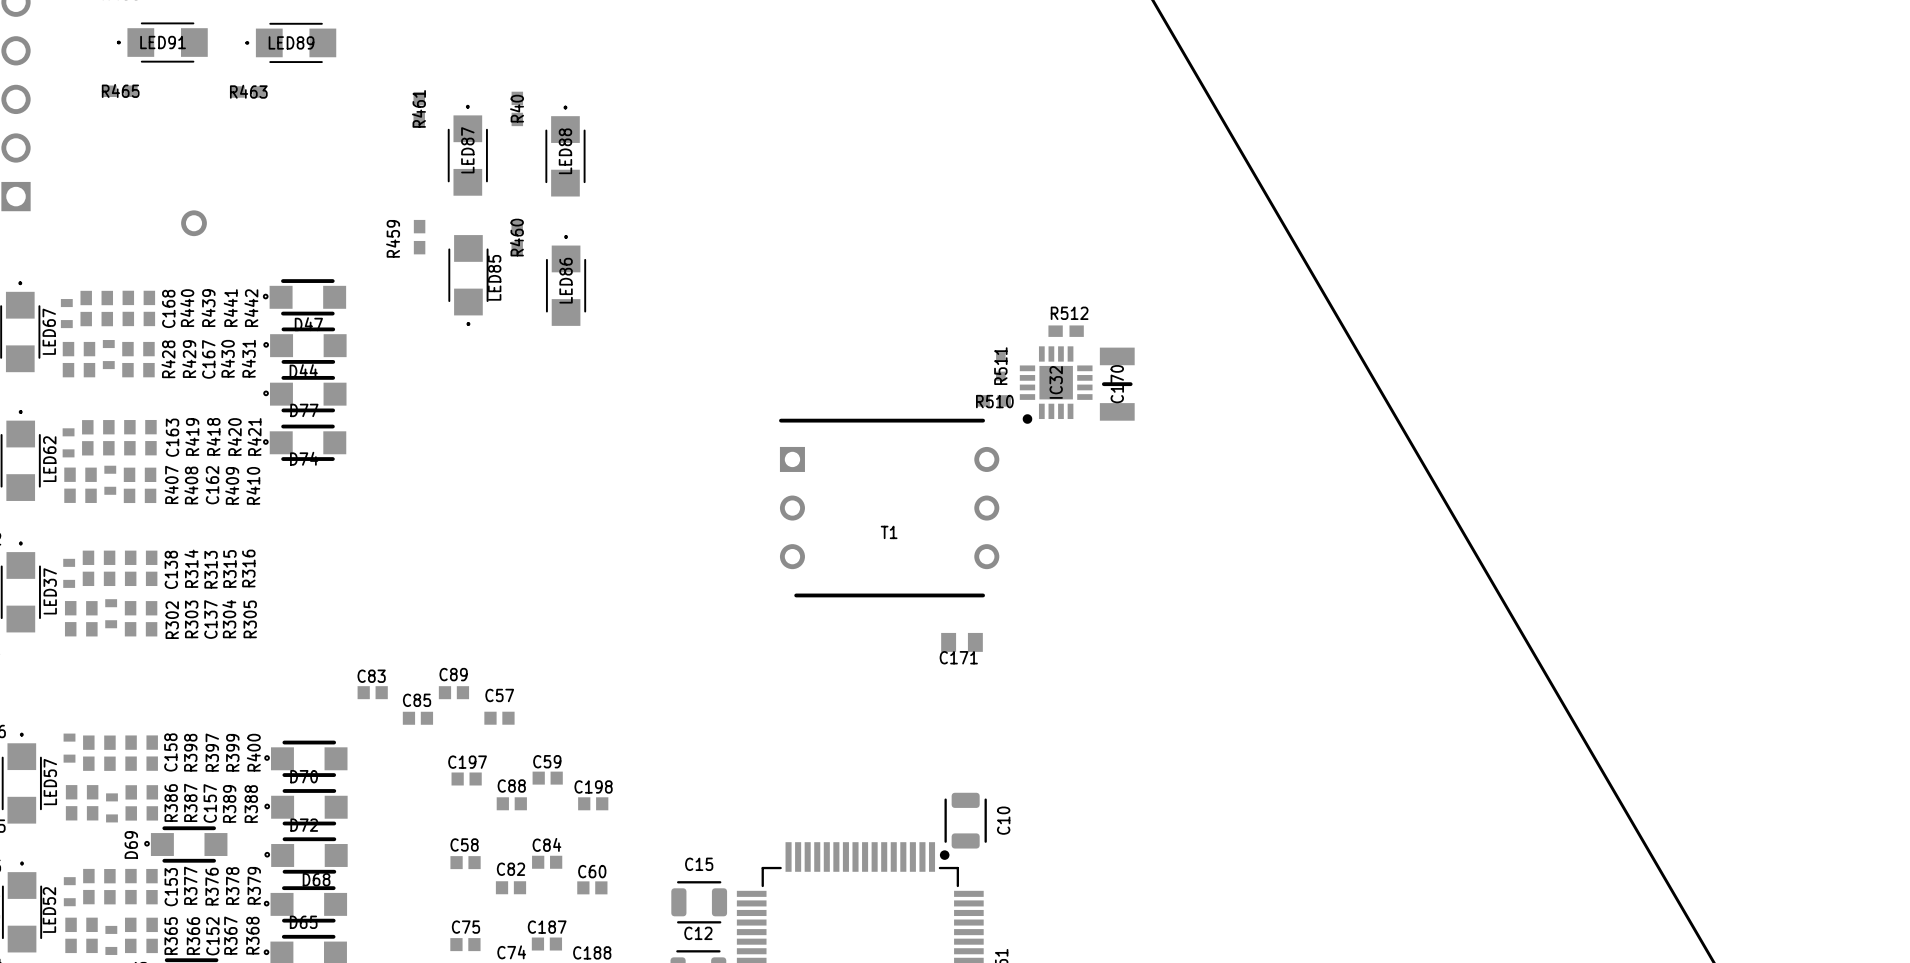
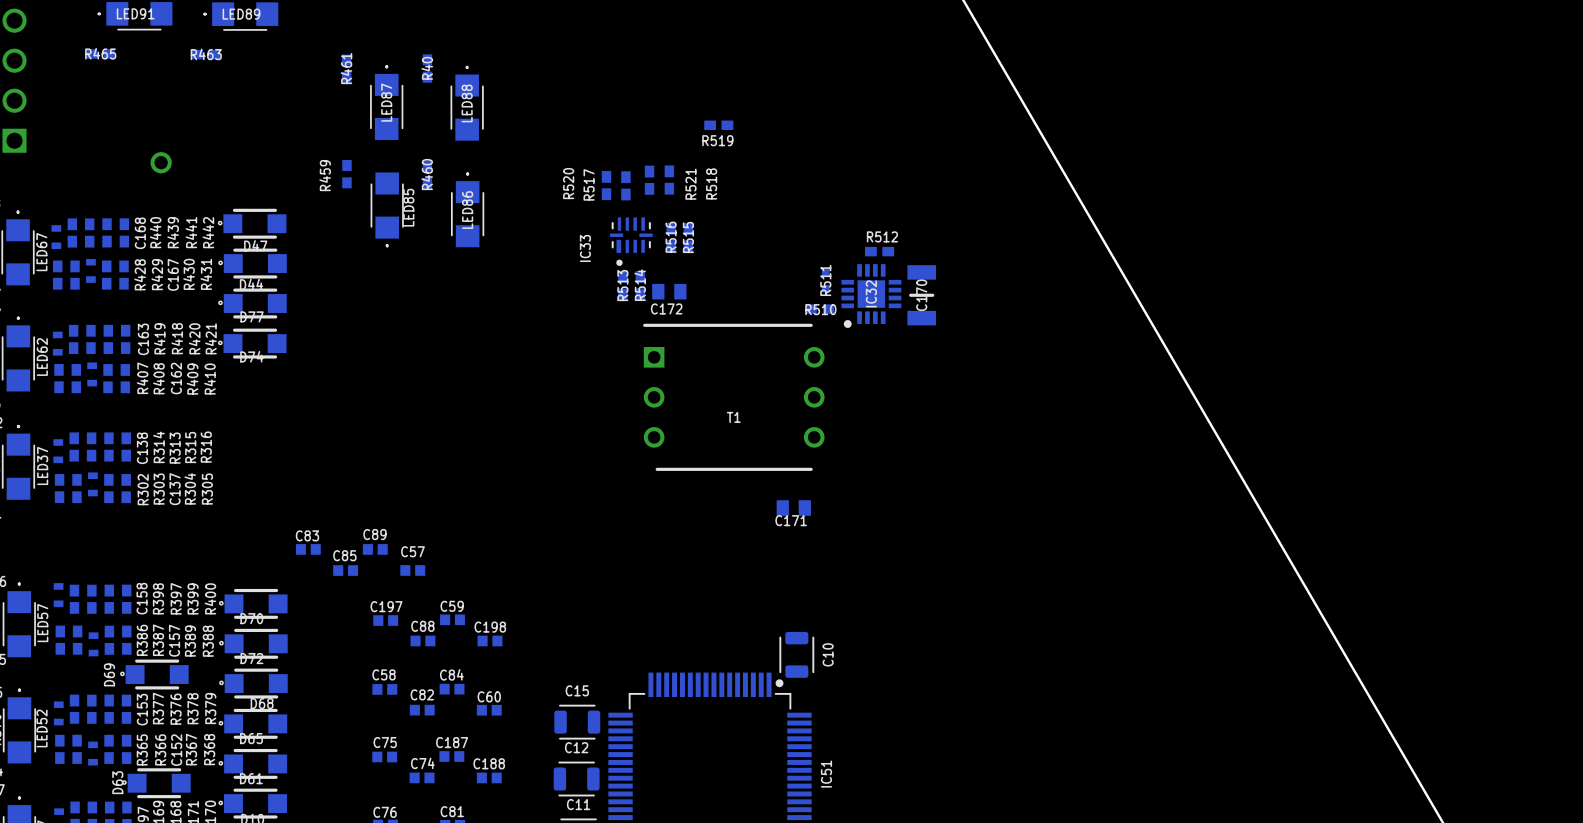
R519: none -> (718, 125)
R521: none -> (649, 180)
R518: none -> (669, 180)
R520: none -> (606, 185)
R517: none -> (625, 185)
R516: none -> (671, 237)
R515: none -> (688, 237)
IC33: none -> (631, 241)
R513: none -> (622, 285)
R514: none -> (640, 285)
C172: none -> (669, 291)

